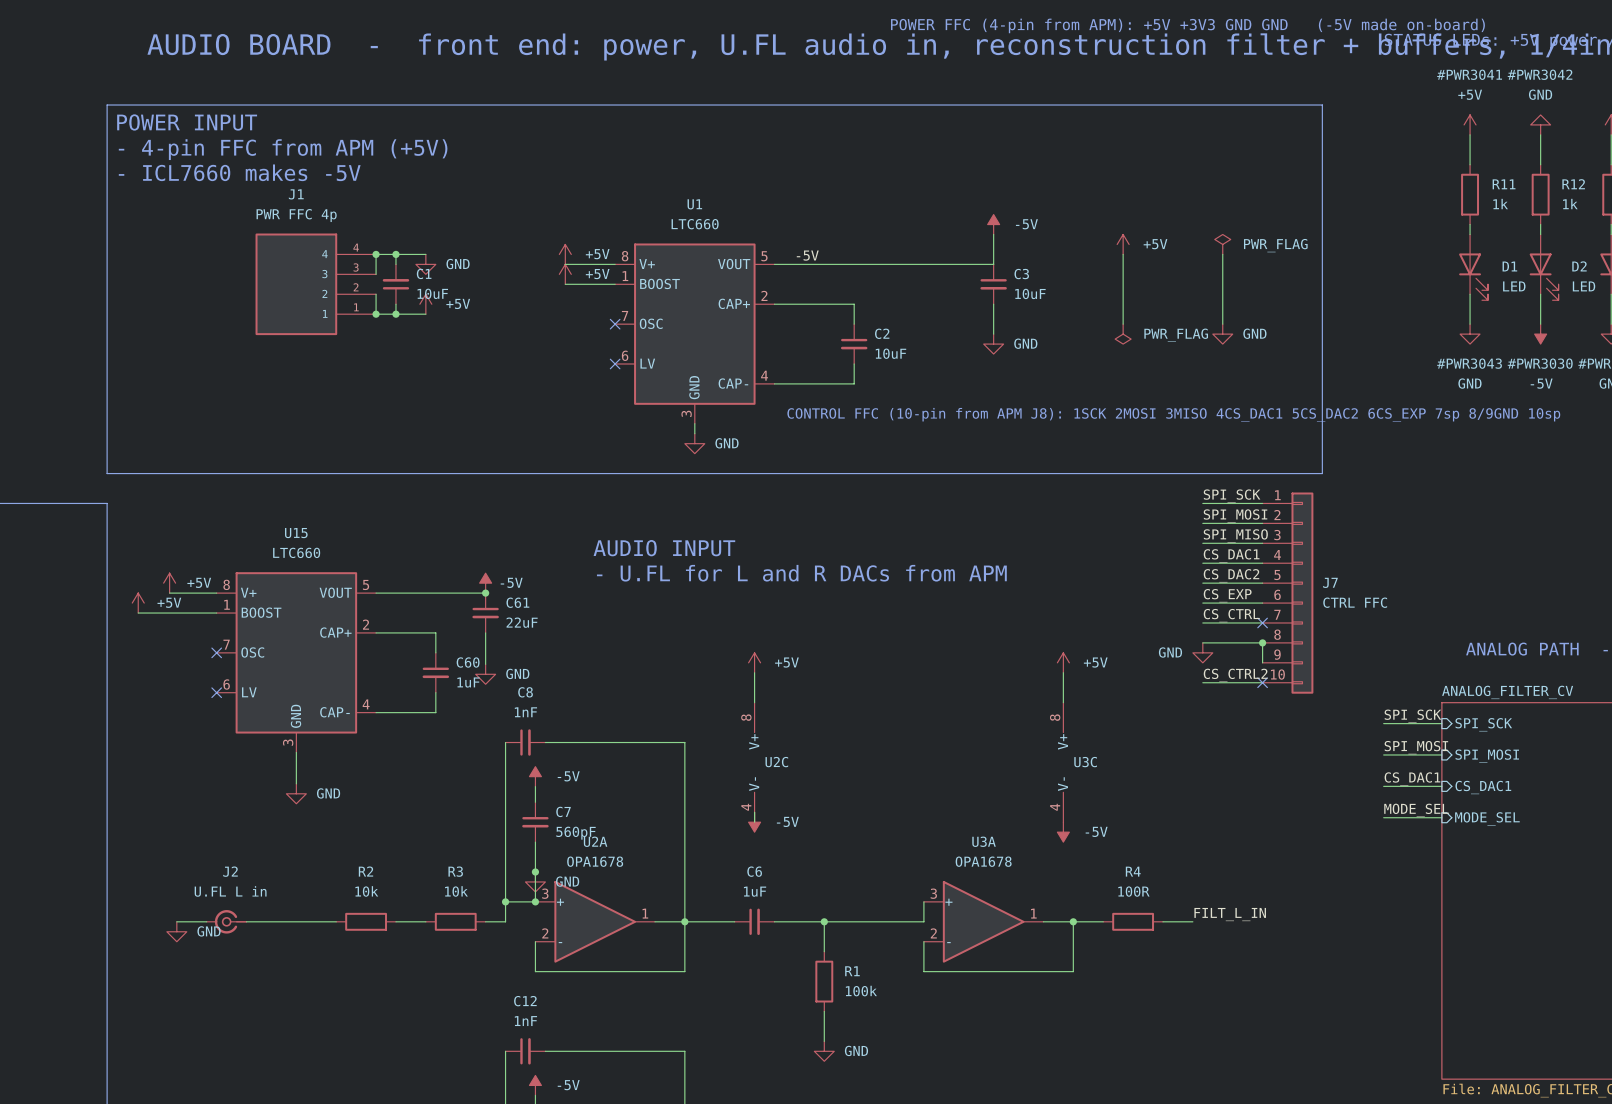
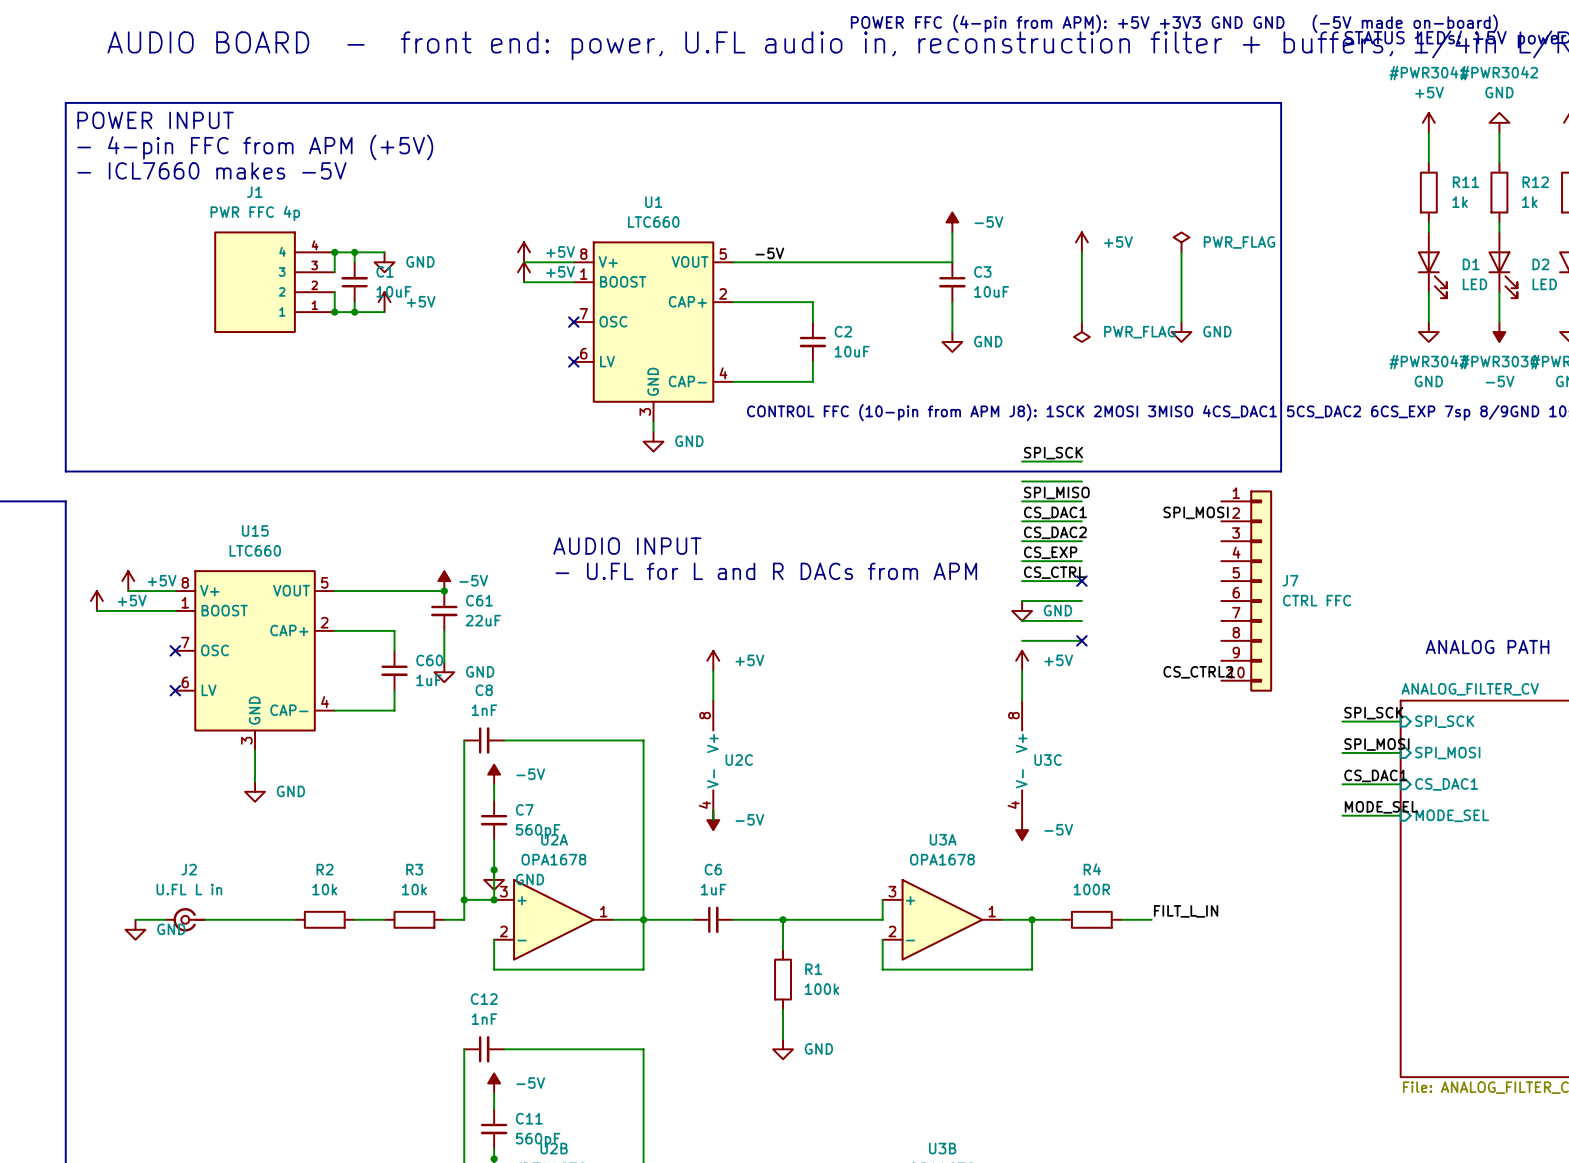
label position: SPI_SCK (1232, 496) -> SPI_SCK (1053, 453)
wire: (1202, 503) (1262, 503) -> (1022, 461) (1081, 461)
wire: (1202, 523) (1262, 523) -> (1022, 481) (1081, 481)
label position: SPI_MISO (1235, 535) -> SPI_MISO (1056, 492)
wire: (1202, 543) (1262, 543) -> (1022, 501) (1081, 501)
label position: CS_DAC1 (1231, 555) -> CS_DAC1 (1055, 512)
wire: (1202, 563) (1262, 563) -> (1022, 521) (1081, 521)
label position: CS_DAC2 (1231, 575) -> CS_DAC2 (1055, 532)
no-connect mark: none -> (1081, 581)
wire: (1202, 583) (1262, 583) -> (1022, 541) (1081, 541)
label position: CS_EXP (1227, 595) -> CS_EXP (1050, 552)
wire: none -> (1022, 601) (1081, 601)
wire: (1202, 603) (1262, 603) -> (1022, 561) (1081, 561)
label position: CS_CTRL (1231, 615) -> CS_CTRL (1054, 572)
wire: none -> (1022, 620) (1081, 620)
wire: (1202, 622) (1262, 622) -> (1022, 581) (1081, 581)
no-connect mark: (1262, 622) -> none
no-connect mark: none -> (1081, 640)
wire: (1202, 642) (1262, 642) (1262, 662) -> none
junction: (1262, 642) -> none
power symbol text position: GND (1170, 652) -> GND (1058, 610)
power symbol position: GND (1202, 652) -> GND (1022, 610)
wire: (1202, 682) (1262, 682) -> (1022, 640) (1081, 640)
no-connect mark: (1262, 682) -> none

